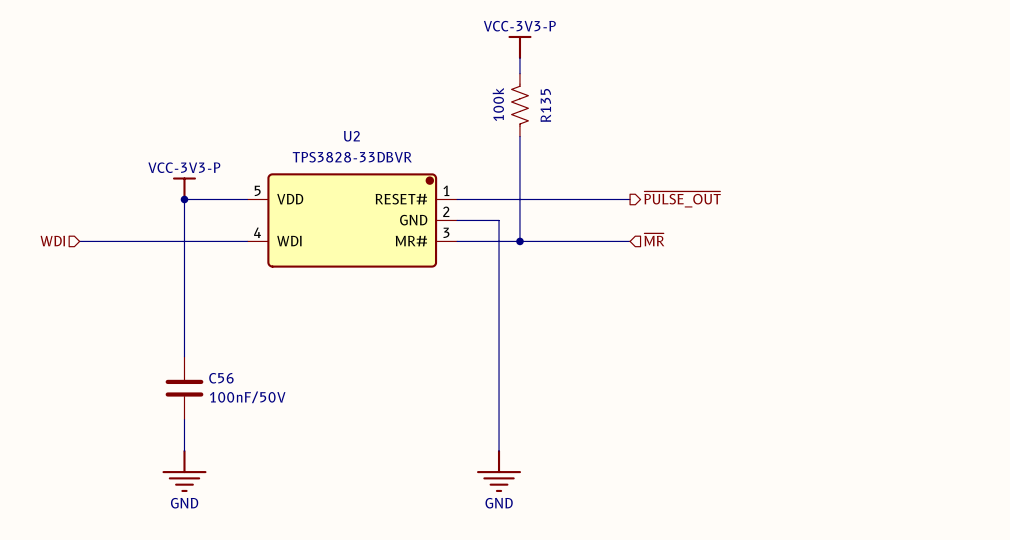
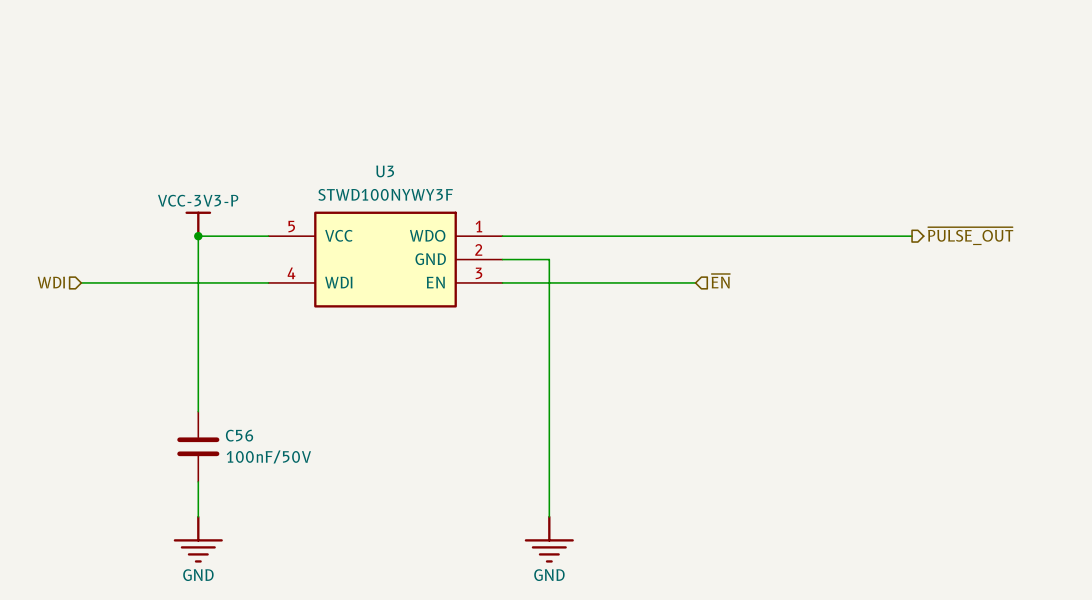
power symbol: VCC-3V3-P (519, 47) -> none
wire: (519, 57) (519, 73) -> none
R135: 100k (519, 105) -> none
wire: (519, 136) (519, 241) -> none
wire: none -> (695, 236) (912, 236)
hierarchical label position: ~{PULSE_OUT} (682, 199) -> ~{PULSE_OUT} (970, 236)
U2: TPS3828-33DBVR (352, 220) -> none
U3: none -> STWD100NYWY3F (385, 259)
hierarchical label: ~{MR} (654, 239) -> ~{EN} (720, 281)
junction: (519, 241) -> none

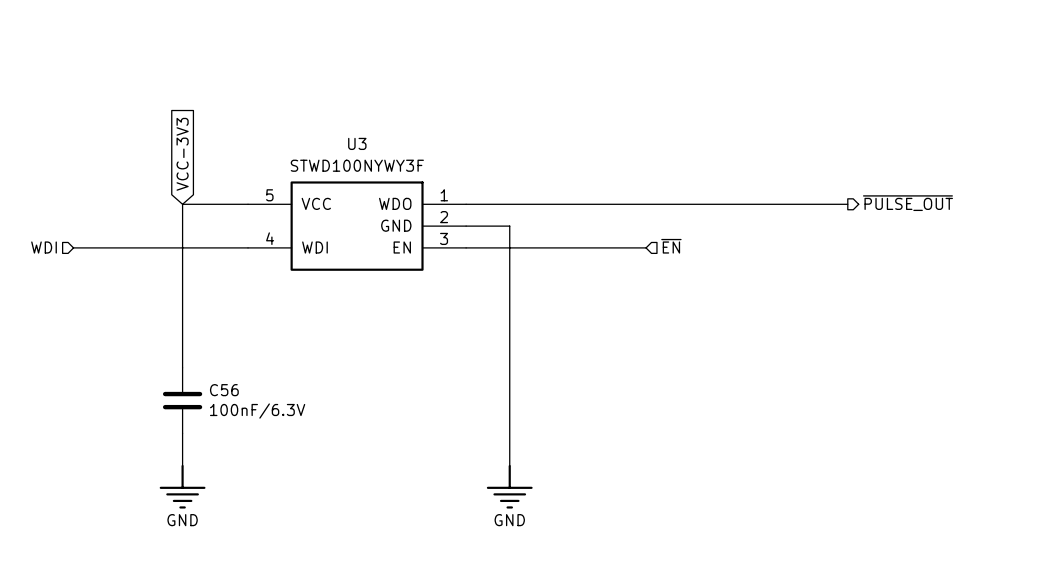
global label: none -> VCC-3V3 (182, 154)
power symbol: VCC-3V3-P (198, 224) -> none
junction: (198, 236) -> none
C56 value: 100nF/50V (268, 456) -> 100nF/6.3V (257, 411)

